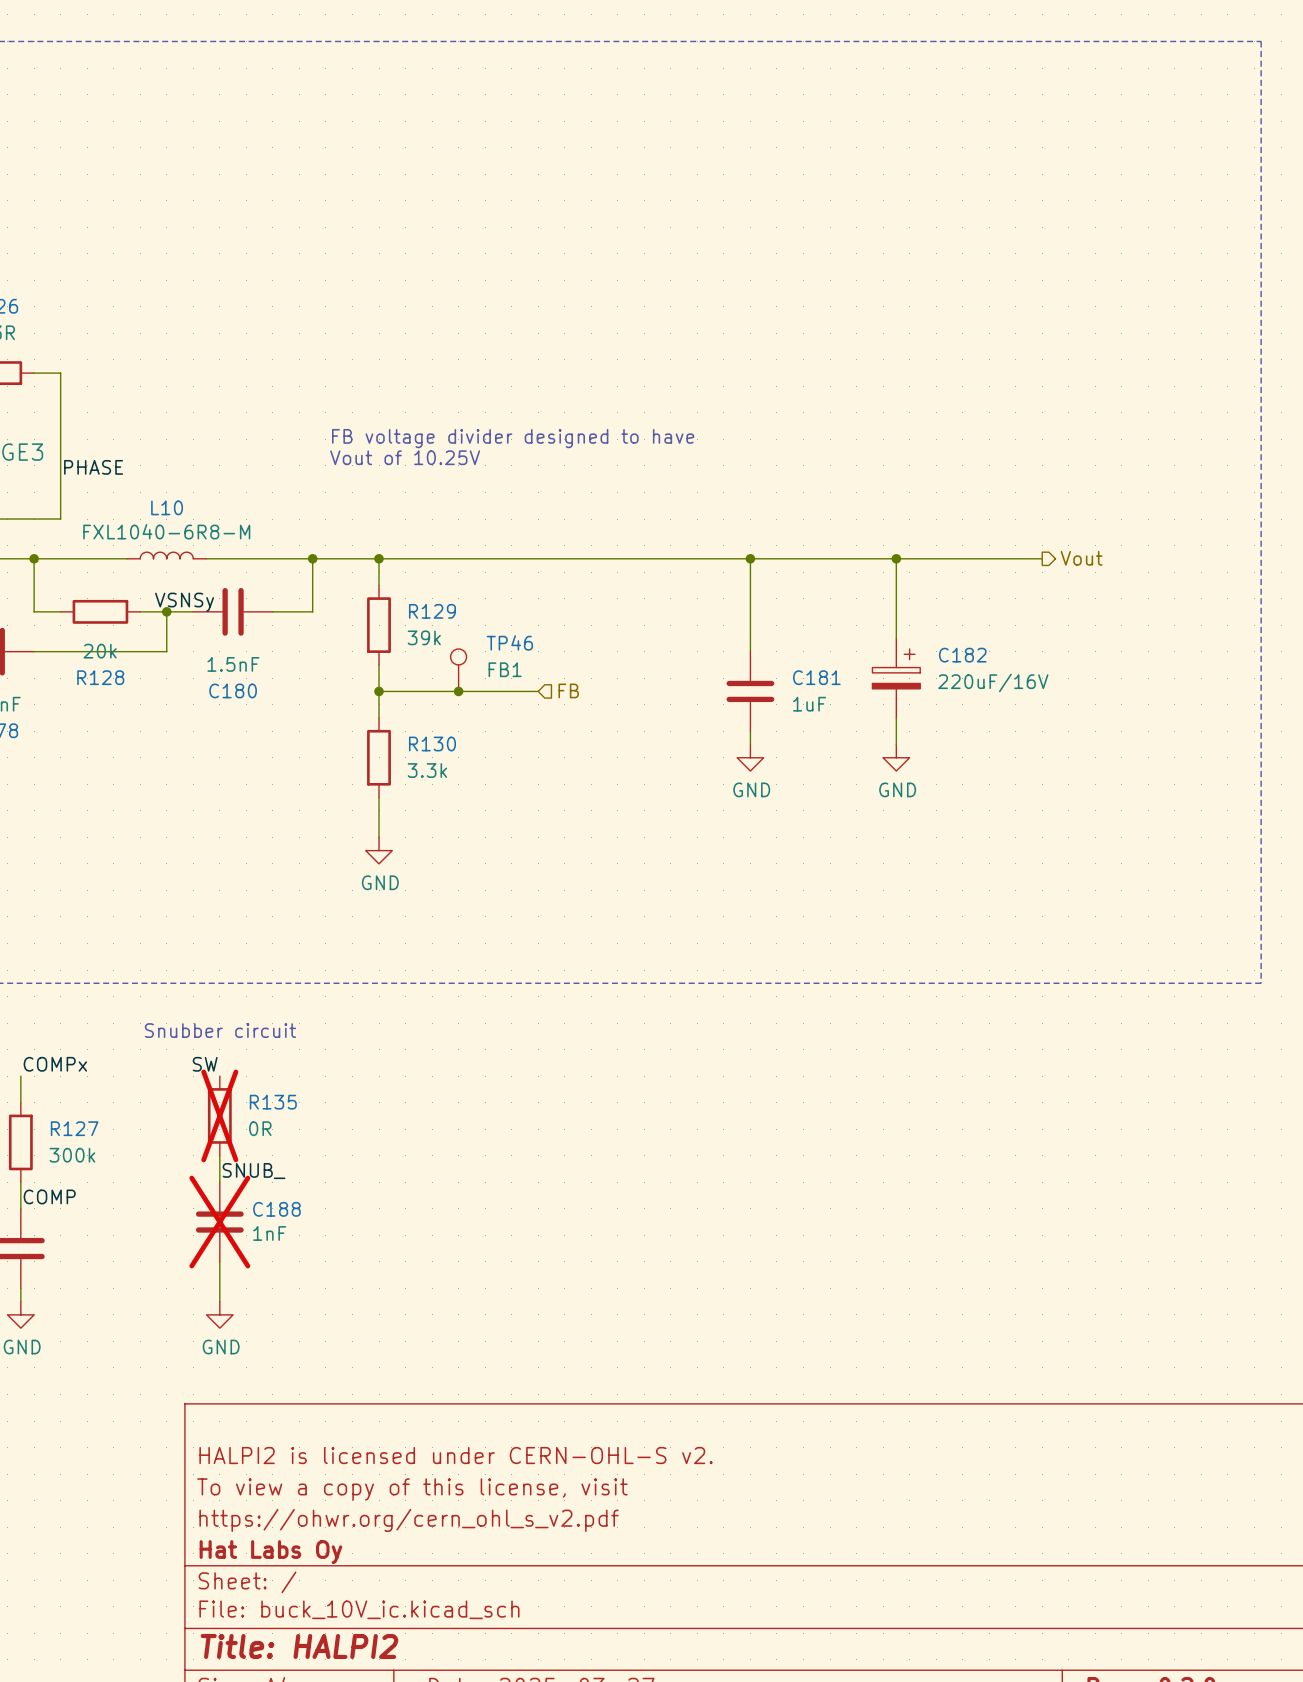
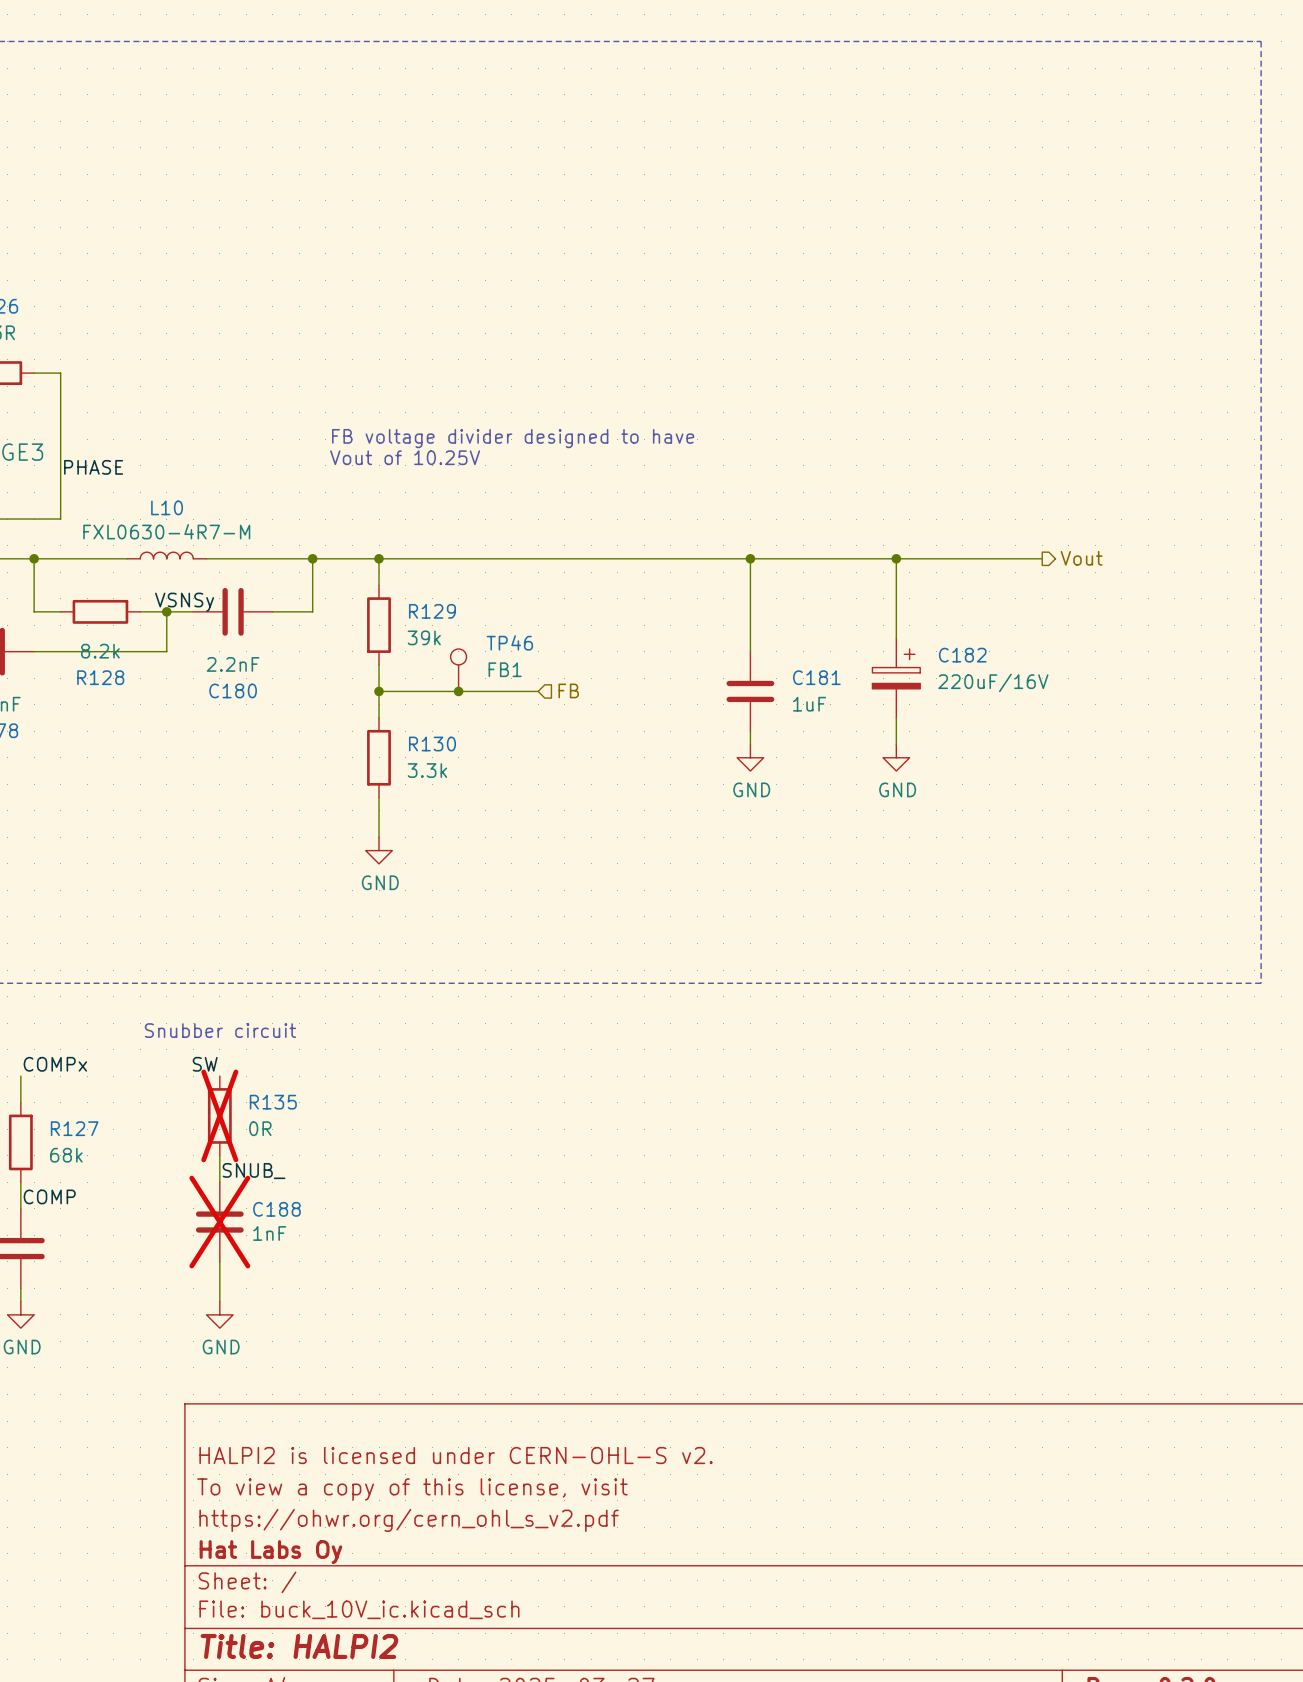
L10 value: FXL1040-6R8-M (166, 531) -> FXL0630-4R7-M (166, 531)
R128 value: 20k (100, 651) -> 8.2k (100, 651)
C180 value: 1.5nF (233, 664) -> 2.2nF (233, 664)
R127 value: 300k (72, 1155) -> 68k (66, 1155)

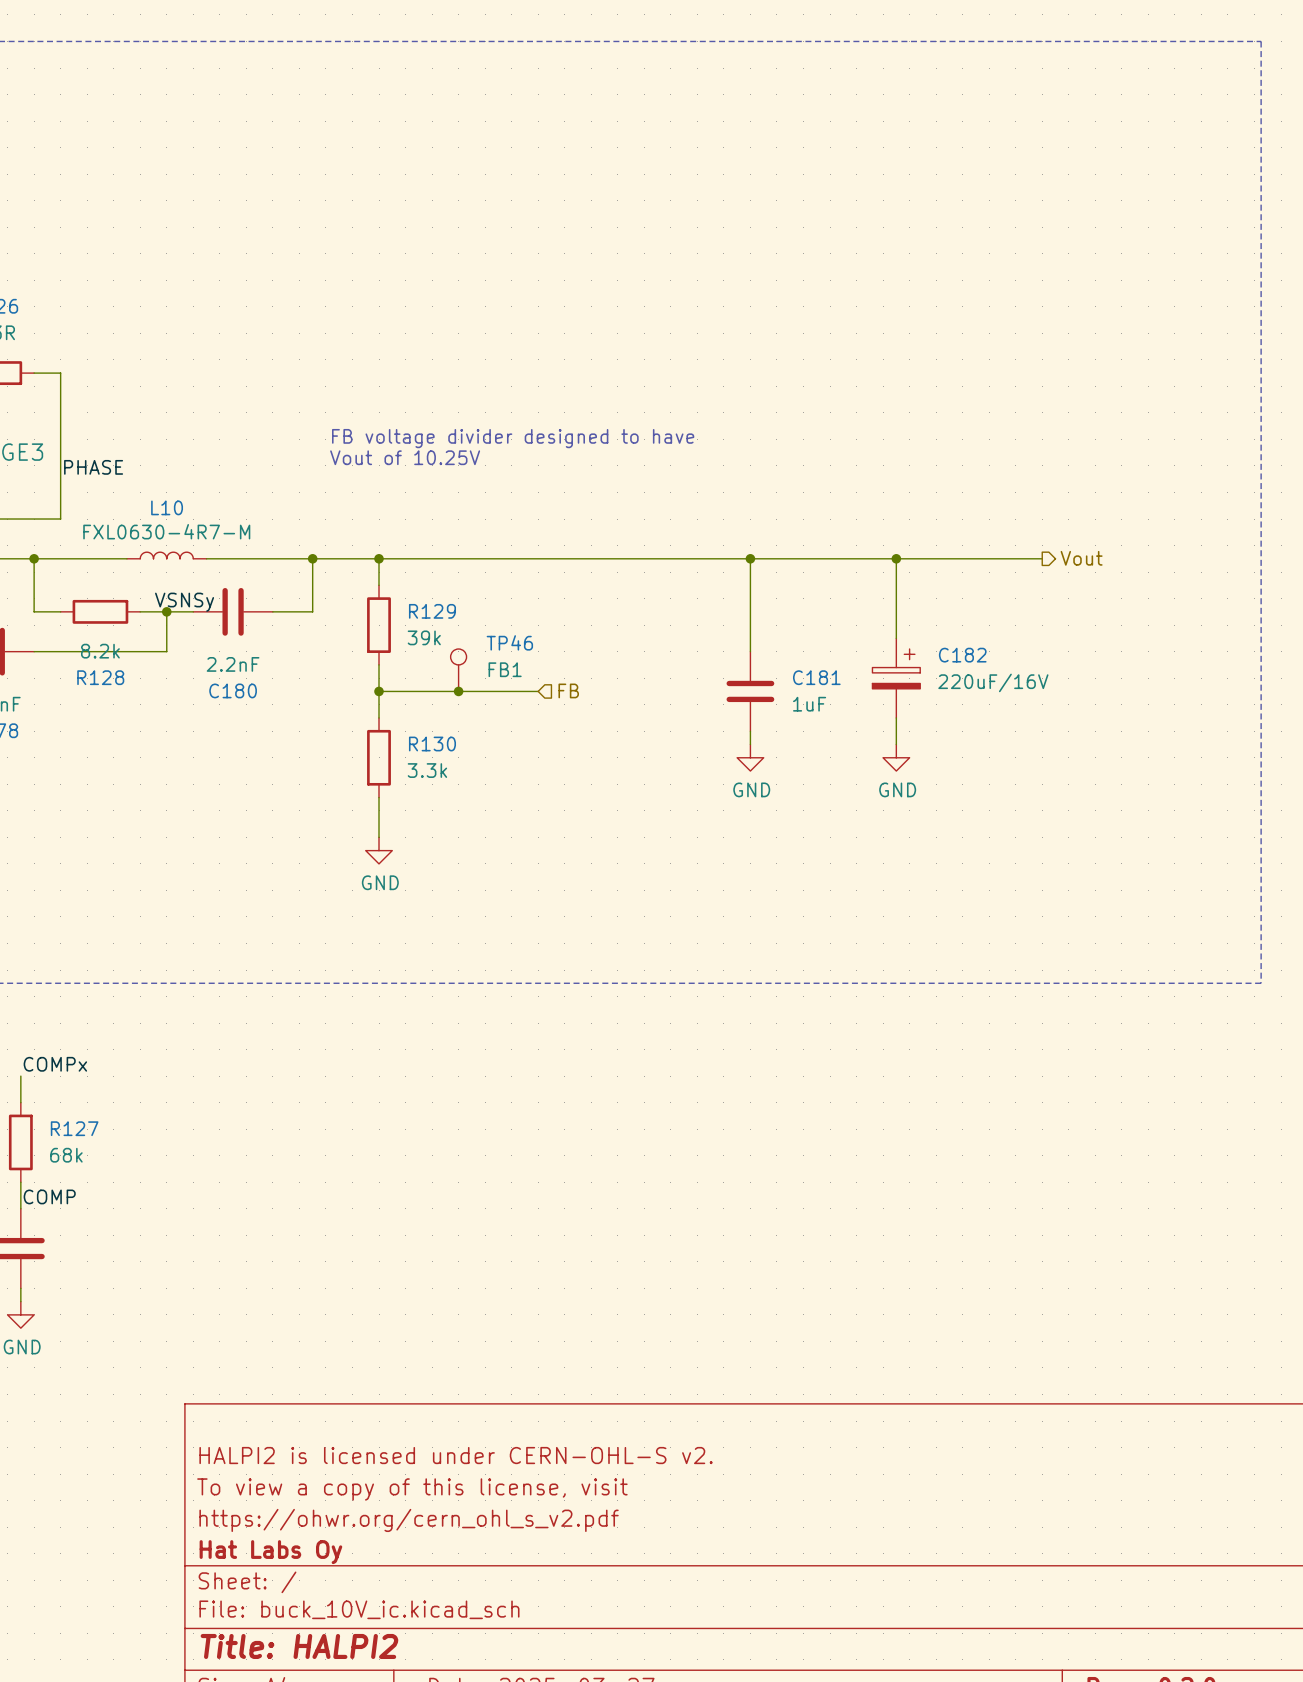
text: Snubber circuit (220, 1030) -> none
label: SW (205, 1064) -> none
R135: 0R (219, 1115) -> none
wire: (219, 1155) (219, 1182) -> none
label: SNUB_ (254, 1171) -> none
C188: 1nF (219, 1222) -> none
wire: (219, 1261) (219, 1301) -> none
power symbol: GND (219, 1314) -> none

